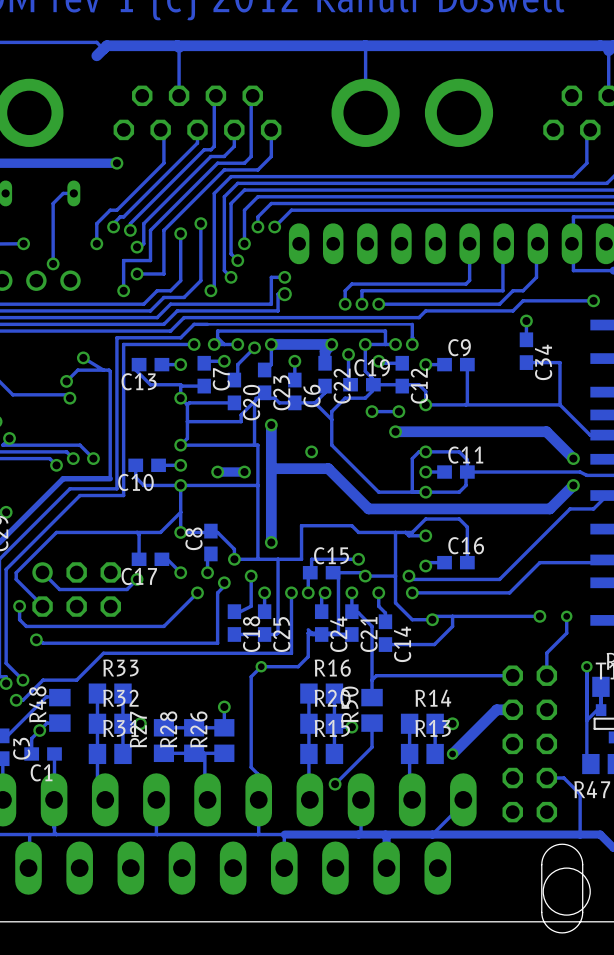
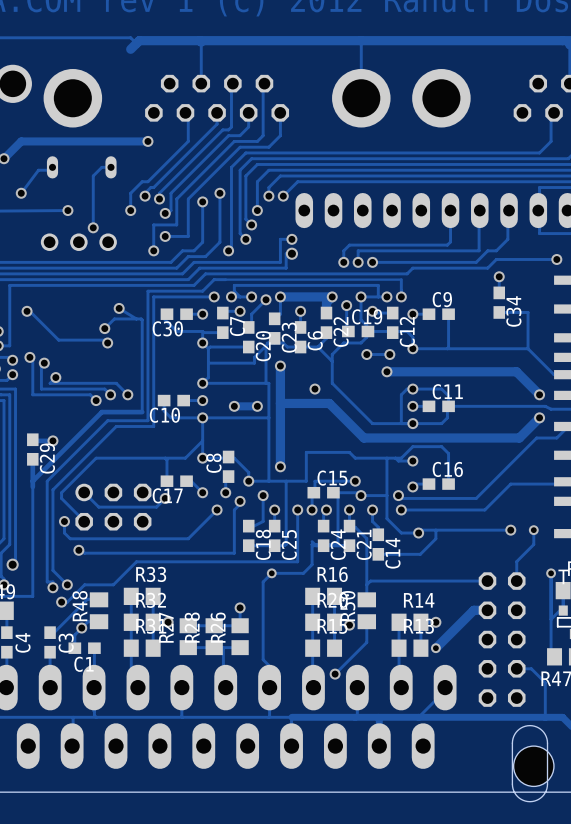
C13 name: C13 (139, 381) -> C30 (167, 328)

